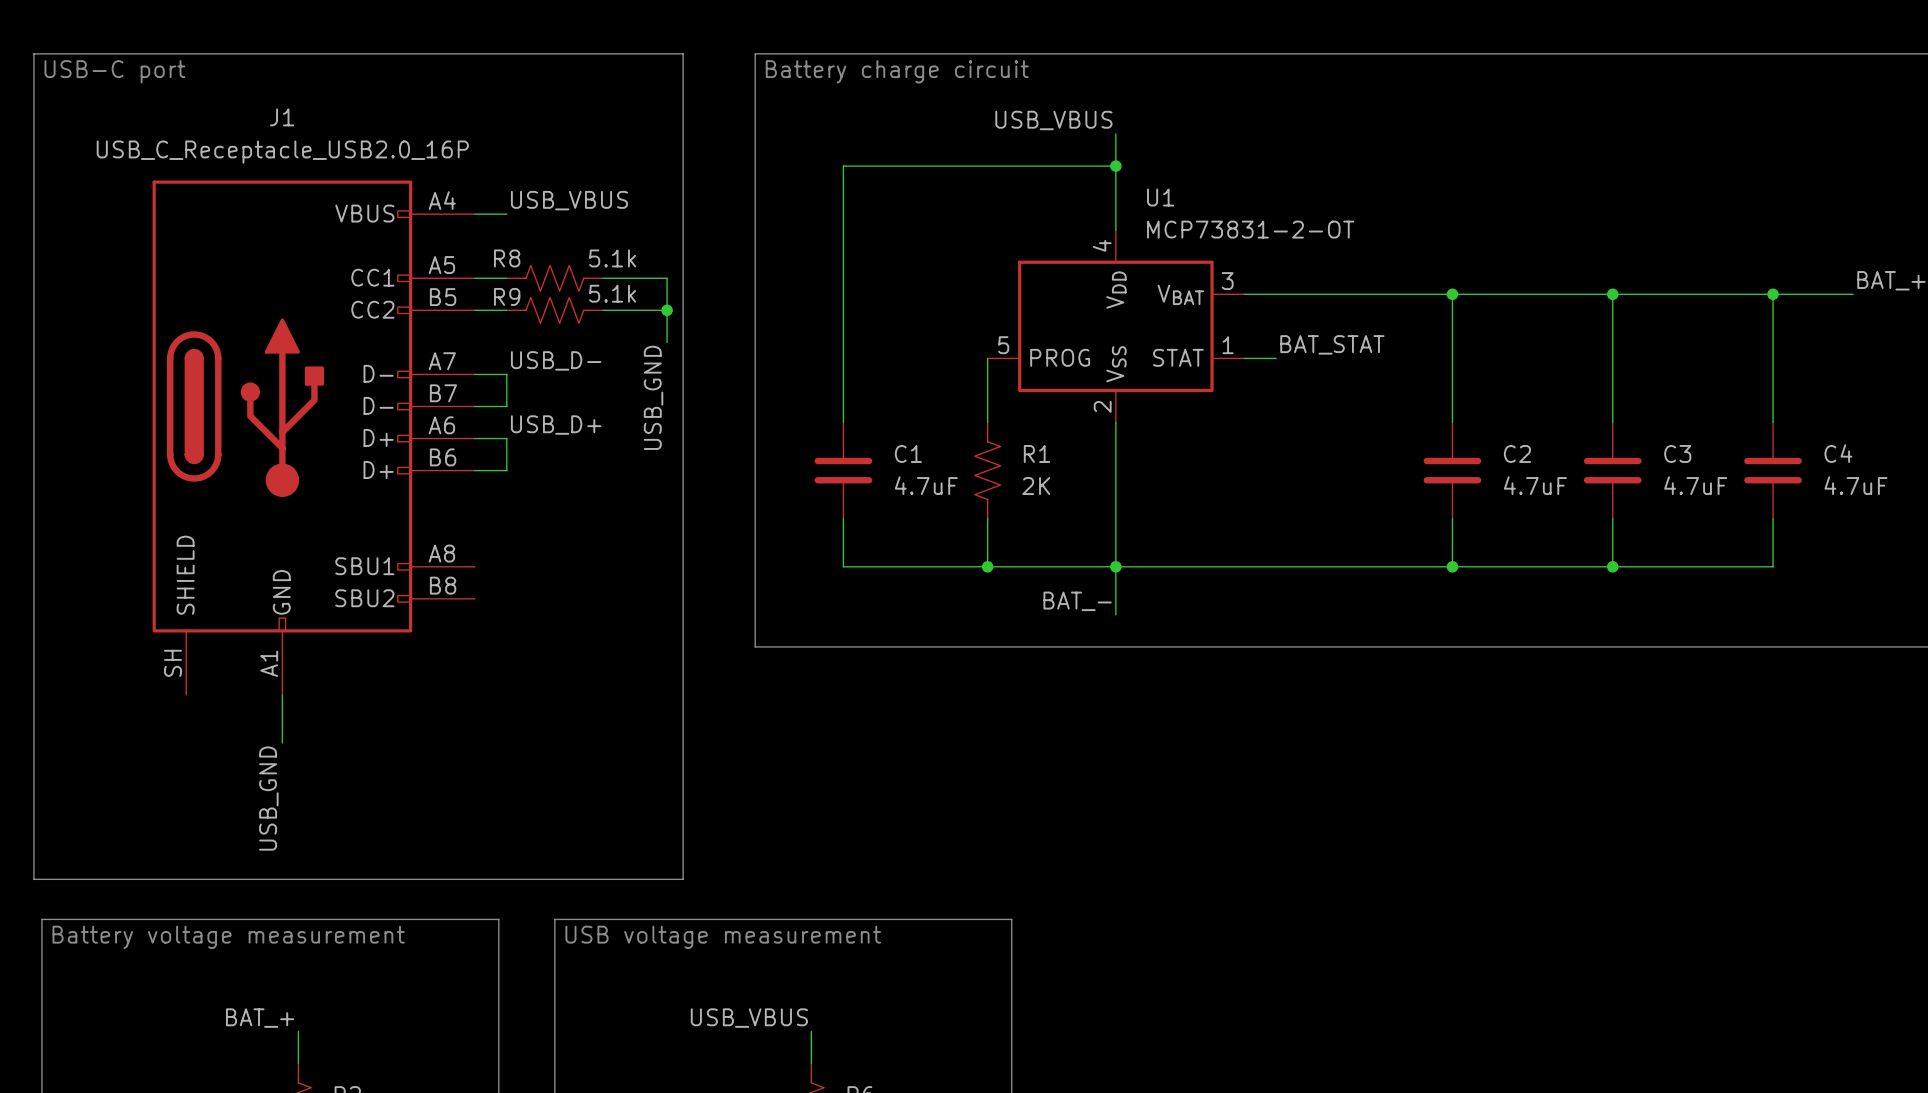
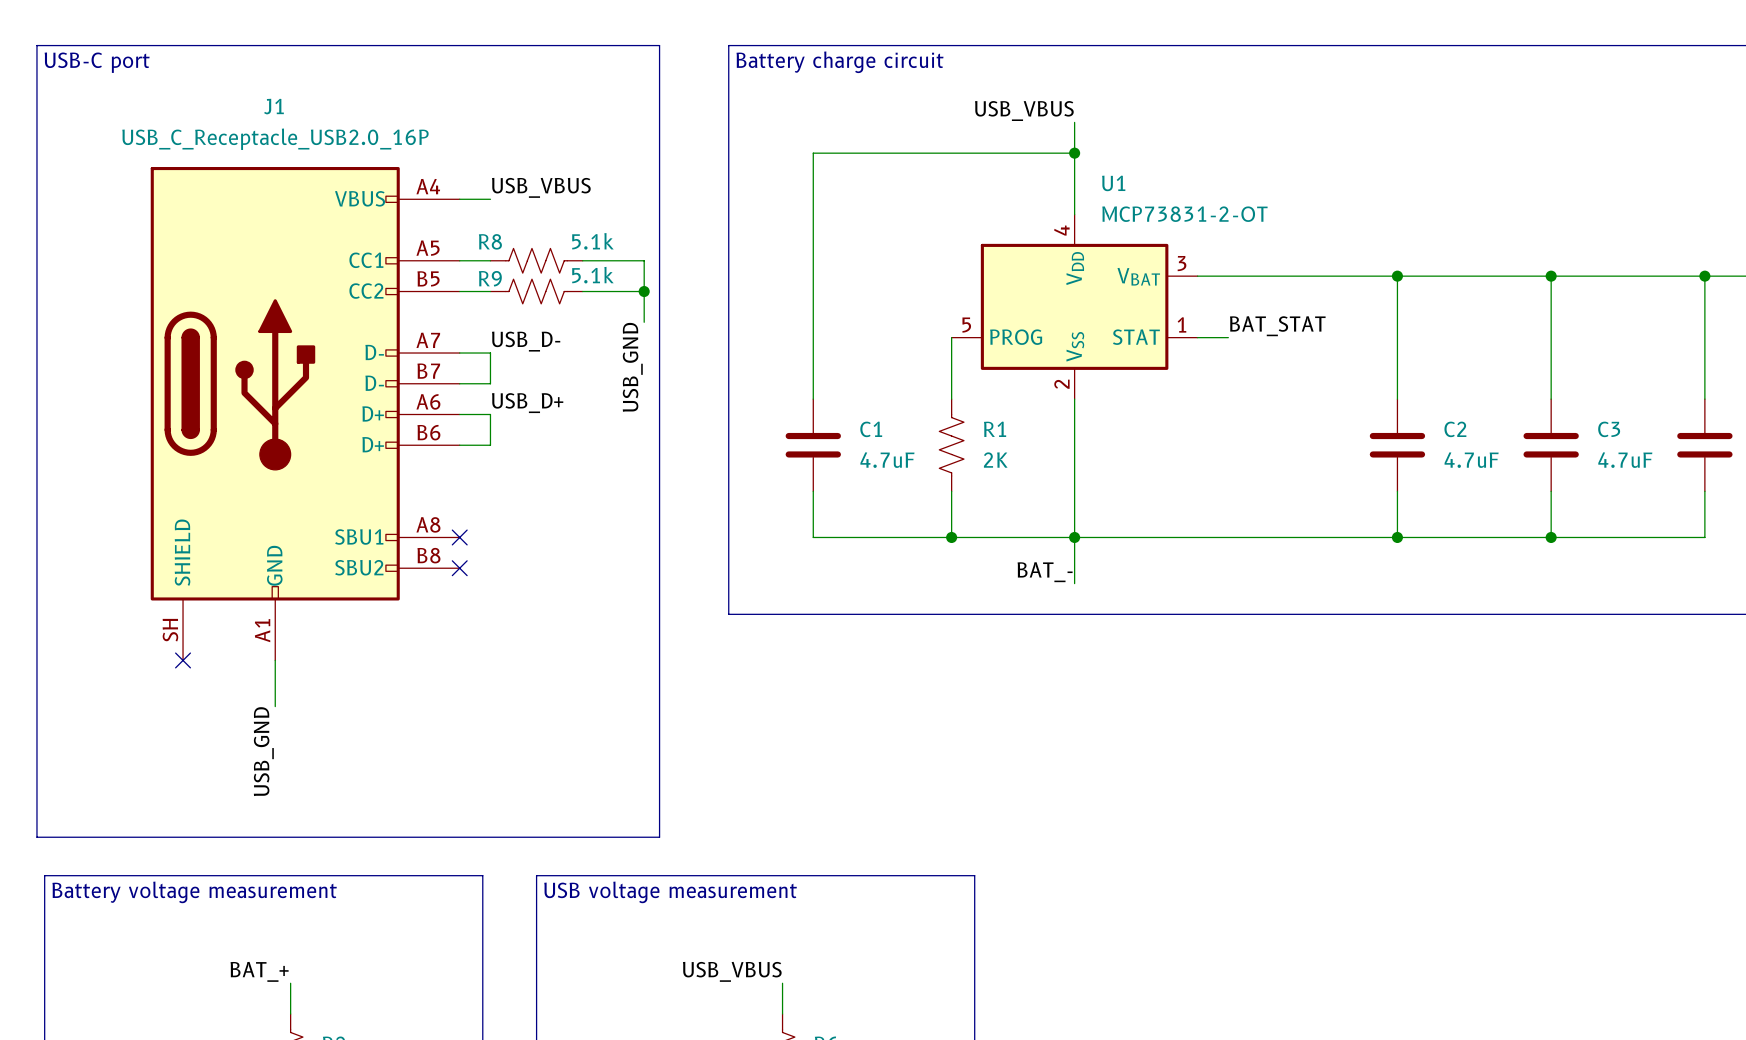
no-connect mark: none -> (459, 537)
no-connect mark: none -> (459, 568)
no-connect mark: none -> (183, 660)

